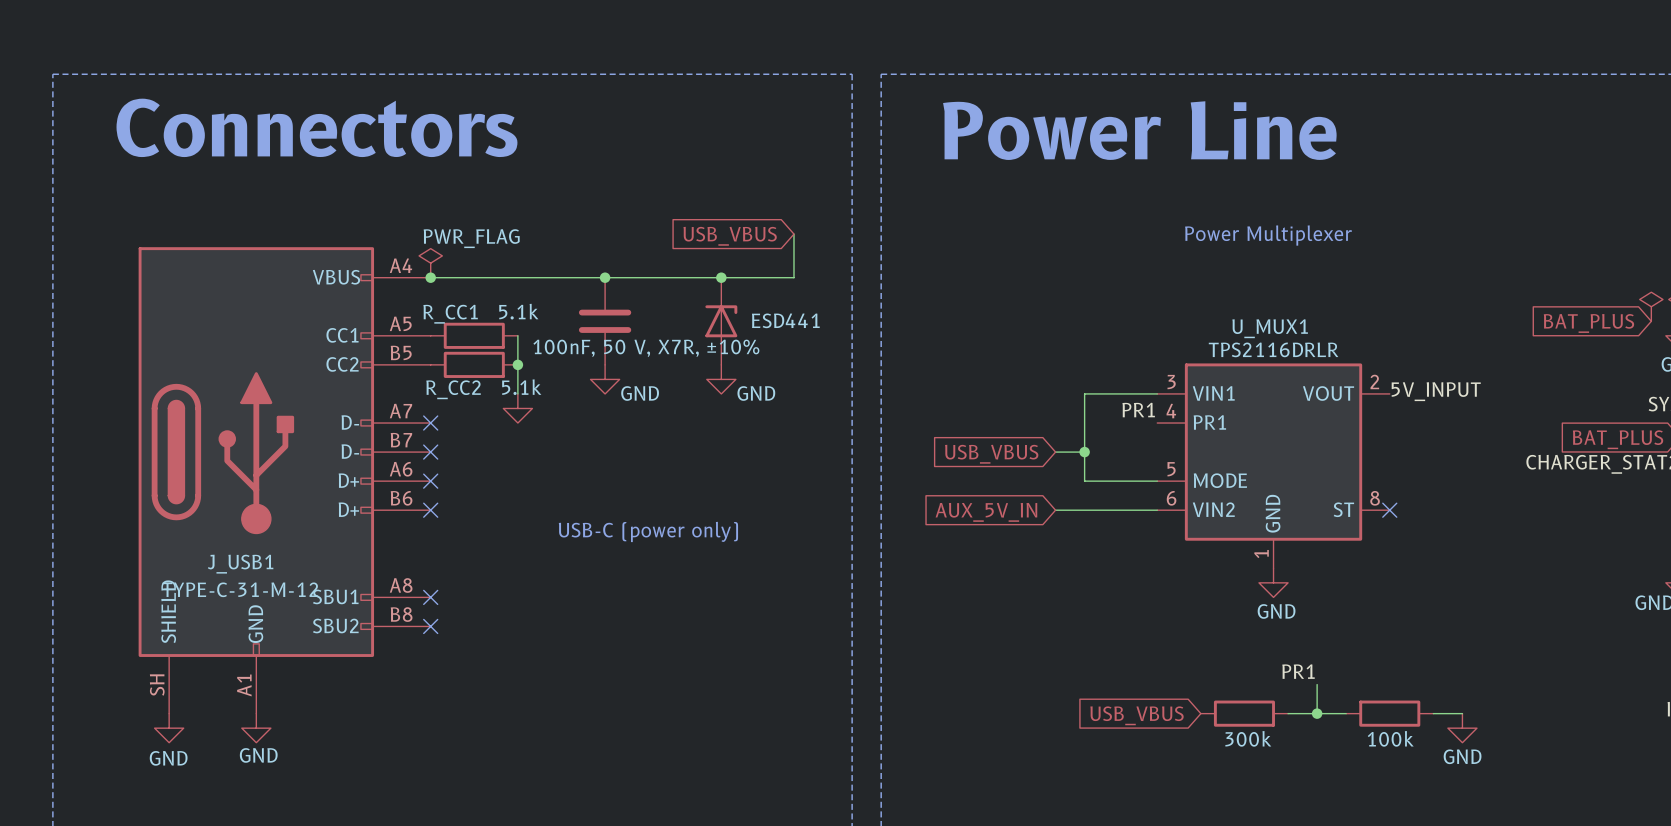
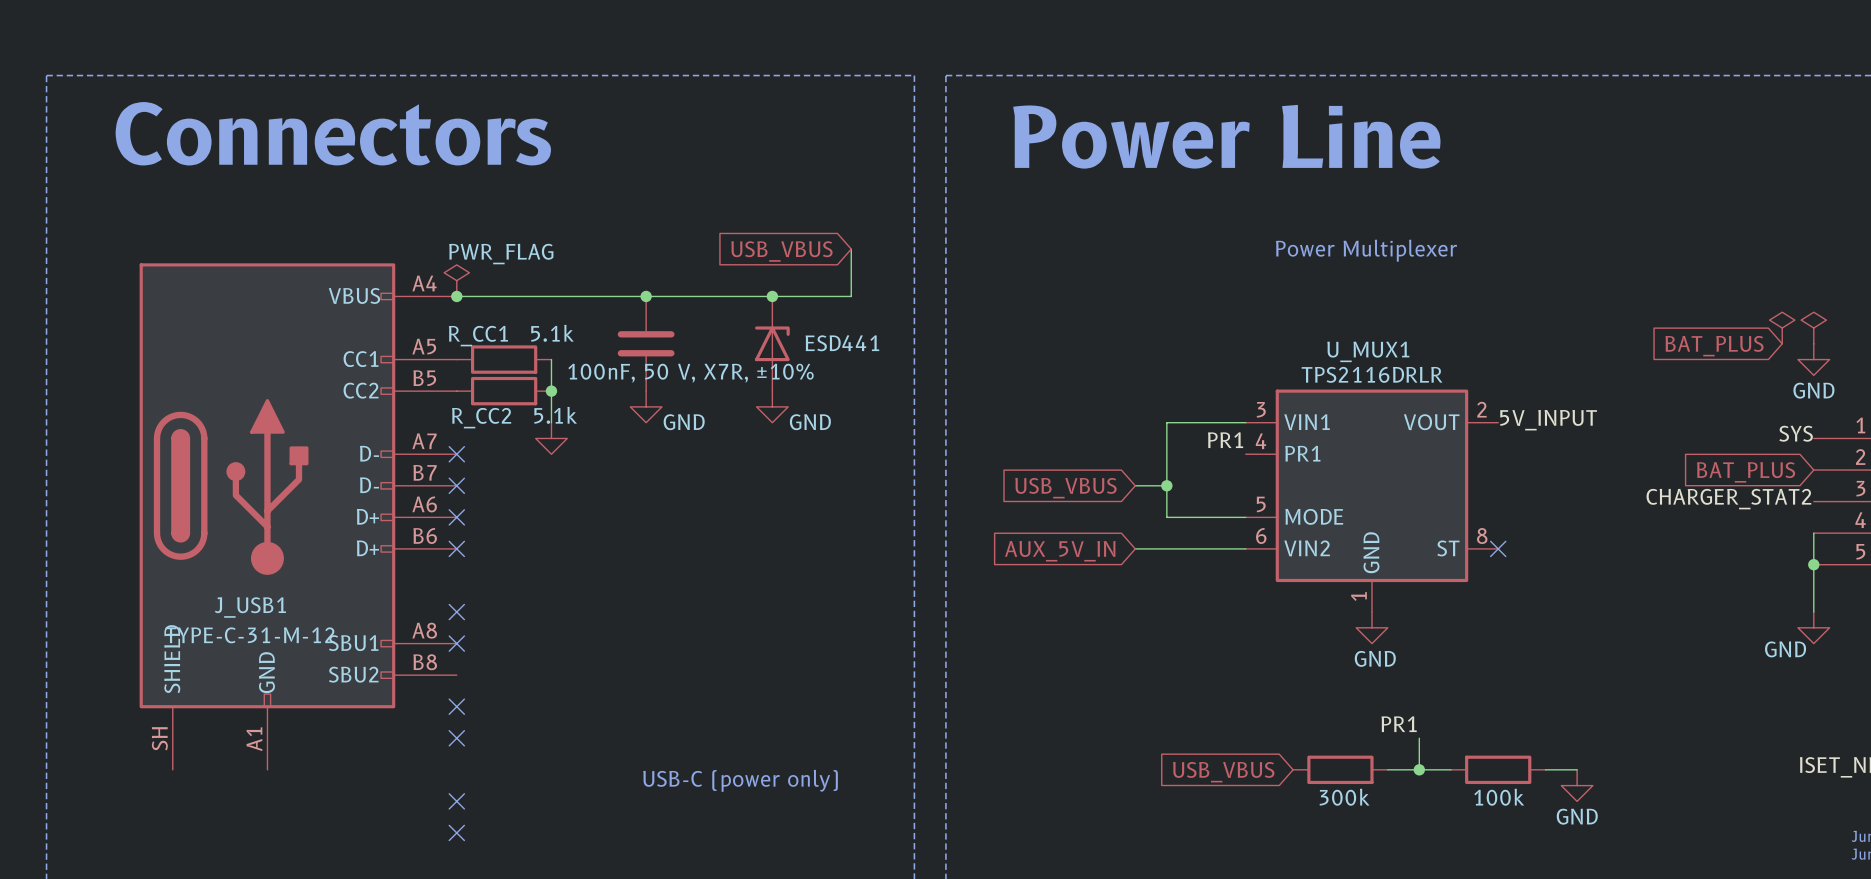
text position: USB-C (power only) (648, 531) -> USB-C (power only) (740, 780)
no-connect mark: none -> (456, 612)
no-connect mark: (430, 626) -> none
no-connect mark: none -> (456, 706)
no-connect mark: none -> (456, 738)
power symbol: GND (169, 728) -> none
power symbol: GND (256, 728) -> none
no-connect mark: none -> (456, 801)
no-connect mark: none -> (456, 832)

